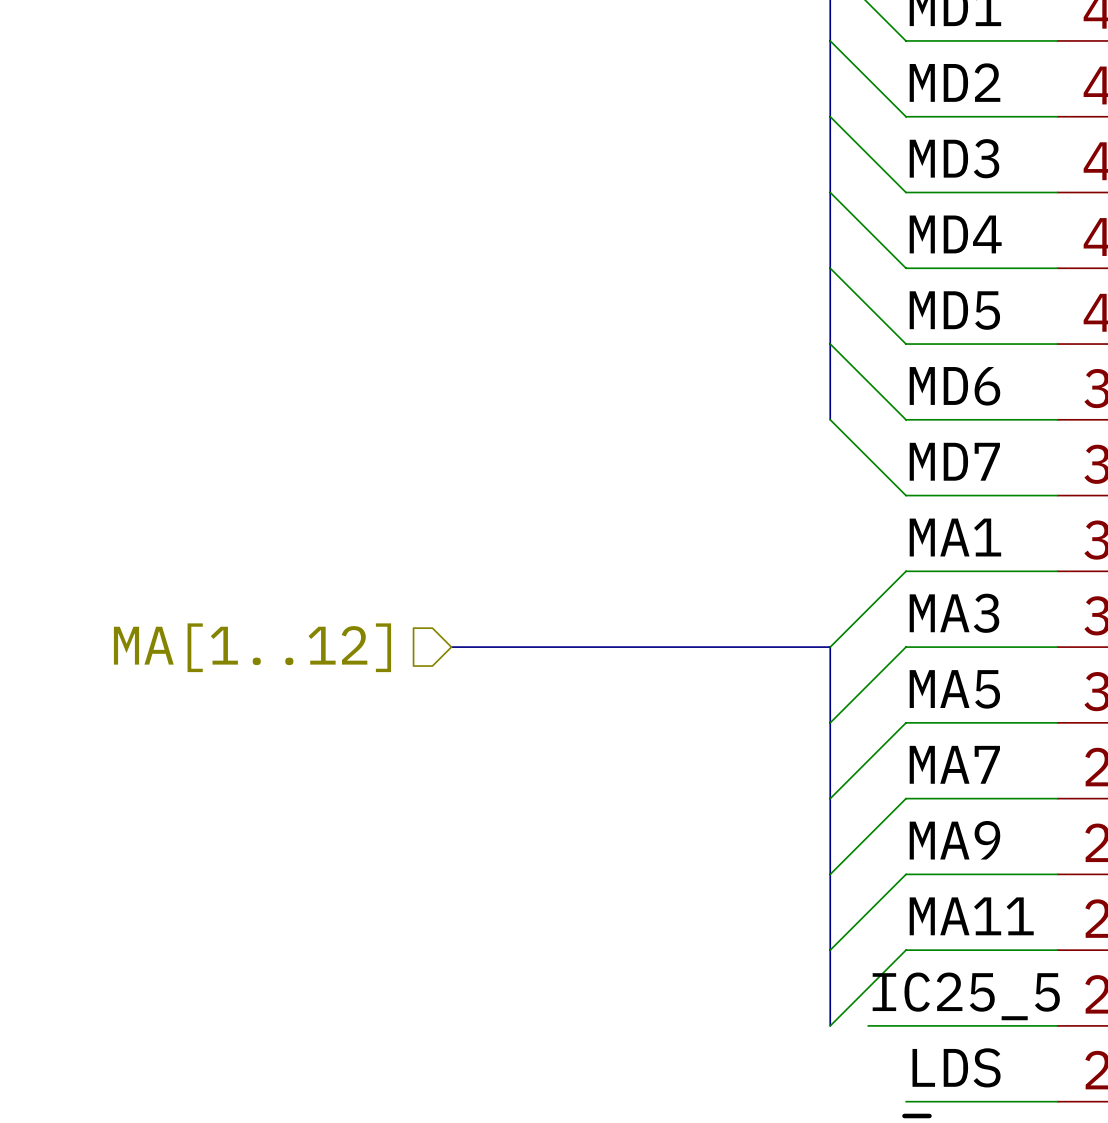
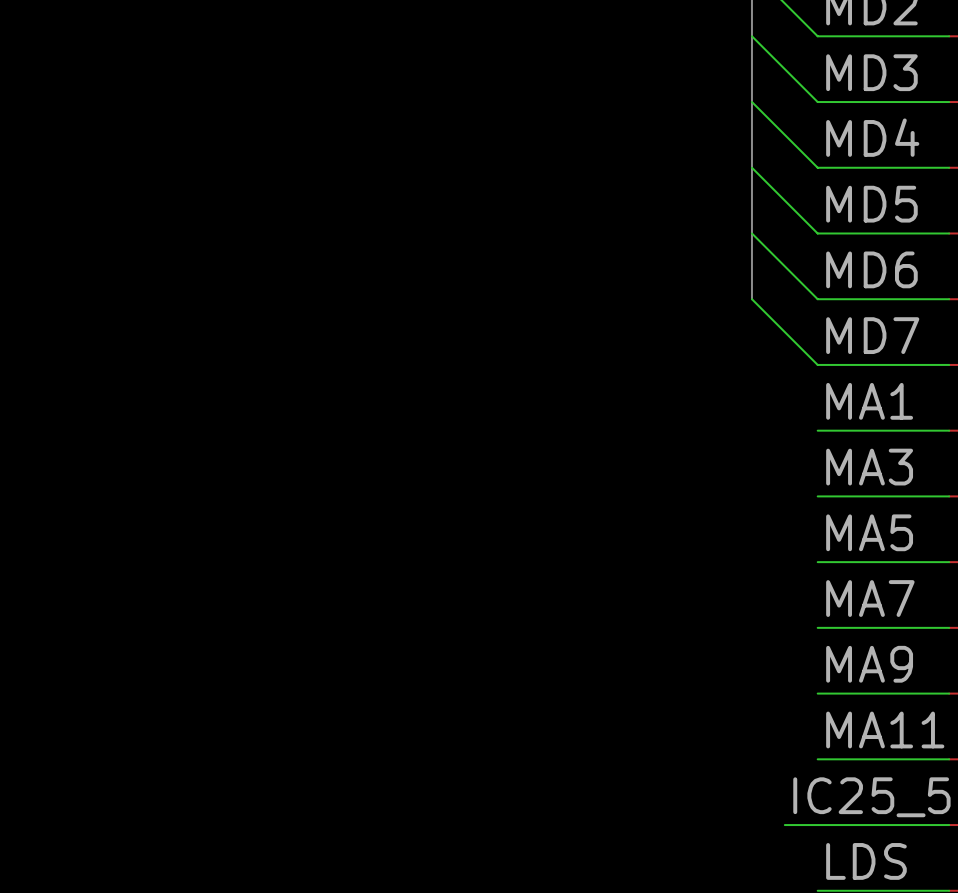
wire: (906, 571) (830, 647) -> none
hierarchical label: MA[1..12] (252, 647) -> none
bus: (451, 647) (830, 647) (830, 1025) -> none
wire: (906, 647) (830, 722) -> none
wire: (906, 722) (830, 798) -> none
wire: (906, 798) (830, 874) -> none
wire: (906, 874) (830, 950) -> none
wire: (906, 950) (830, 1025) -> none

